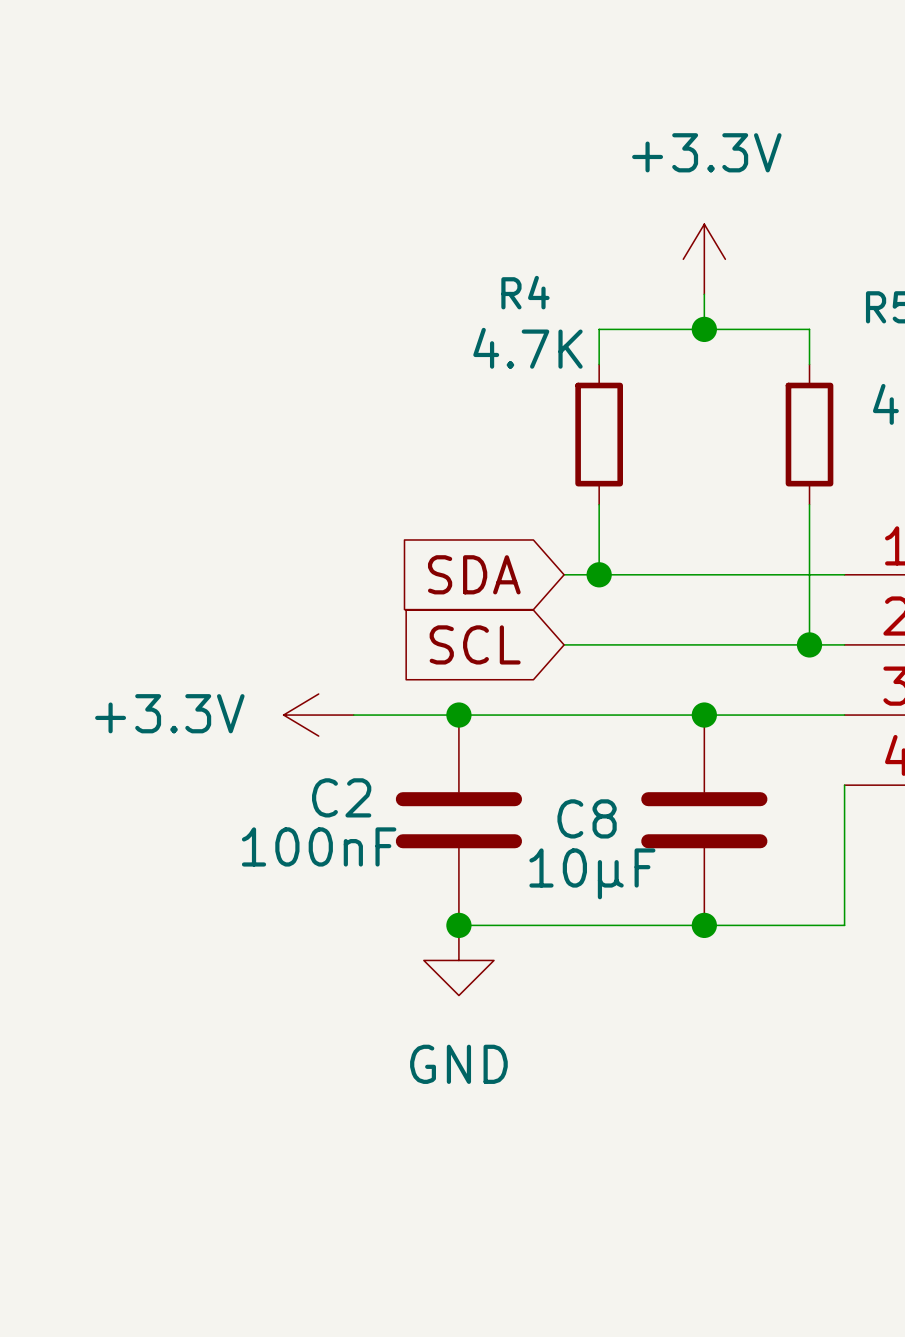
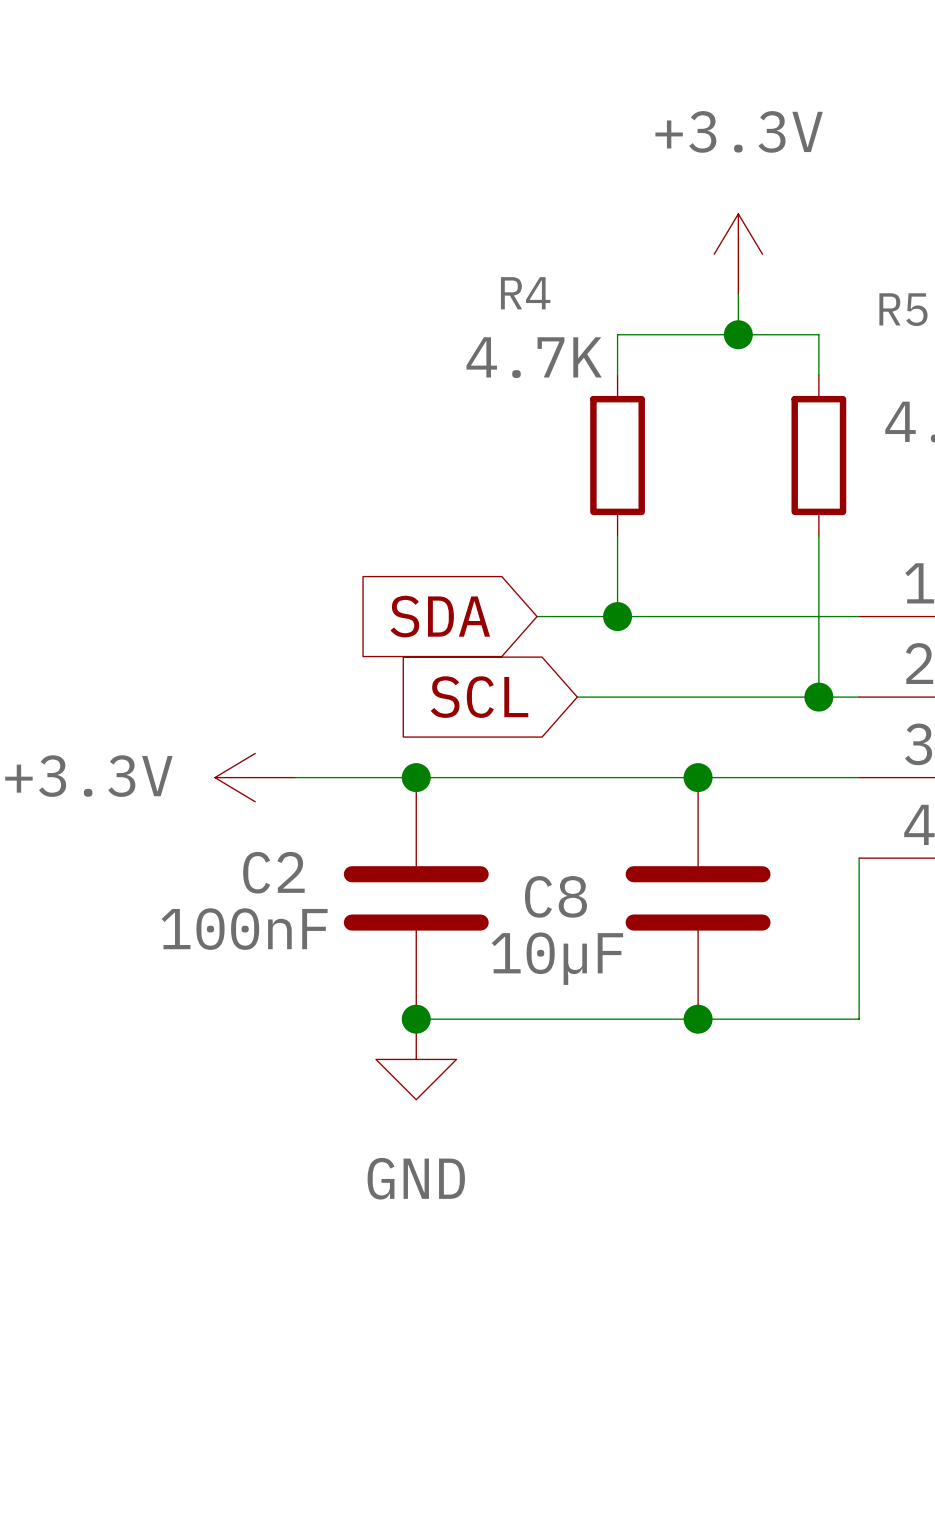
power symbol position: +3.3V (704, 259) -> +3.3V (738, 254)
wire: (704, 294) (704, 329) -> (738, 294) (738, 334)
wire: (634, 329) (599, 329) (599, 364) -> (617, 334) (617, 374)
junction position: (704, 329) -> (738, 334)
R4 position: (599, 434) -> (617, 455)
wire: (599, 504) (599, 574) -> (617, 536) (617, 616)
junction position: (599, 574) -> (617, 616)
global label position: SCL (475, 644) -> SCL (479, 697)
wire: (564, 644) (599, 644) -> none

